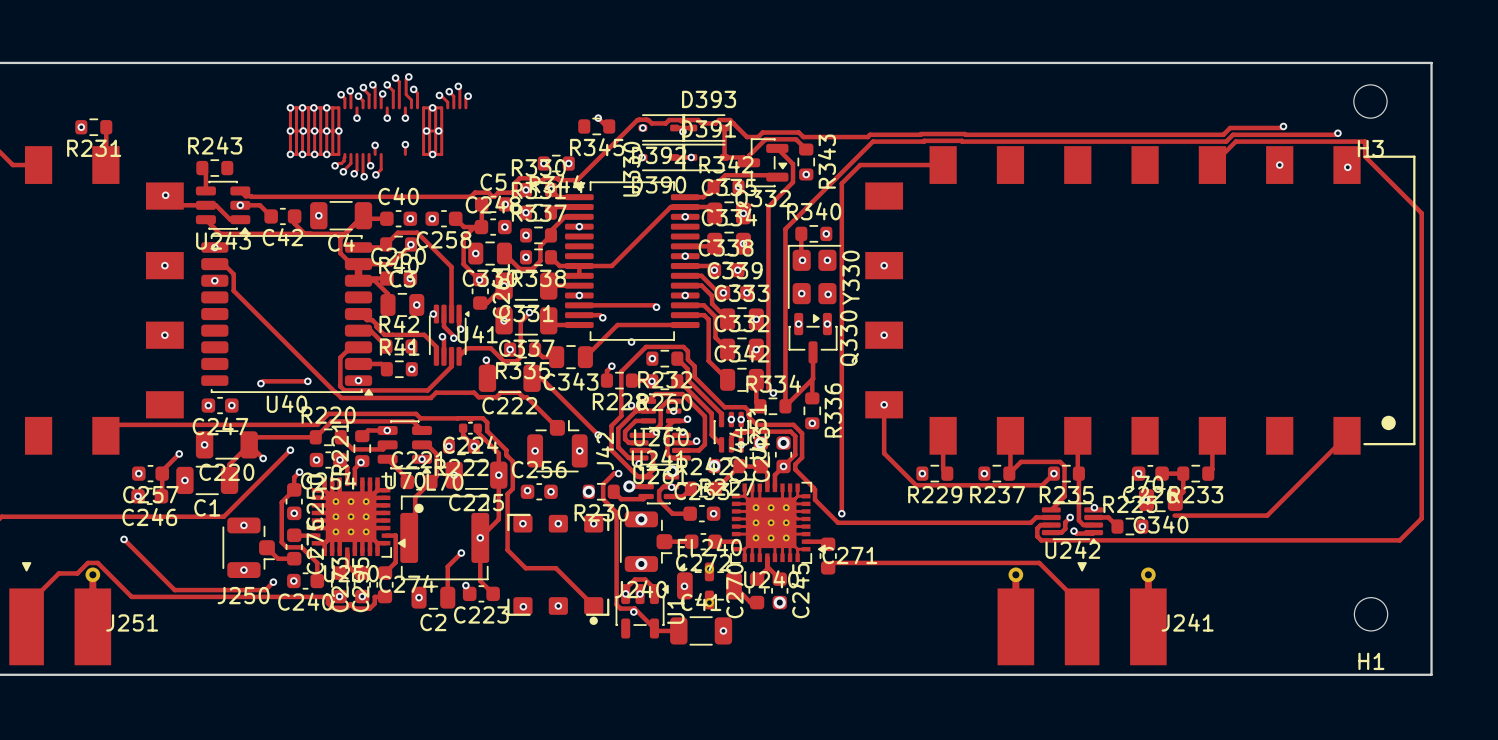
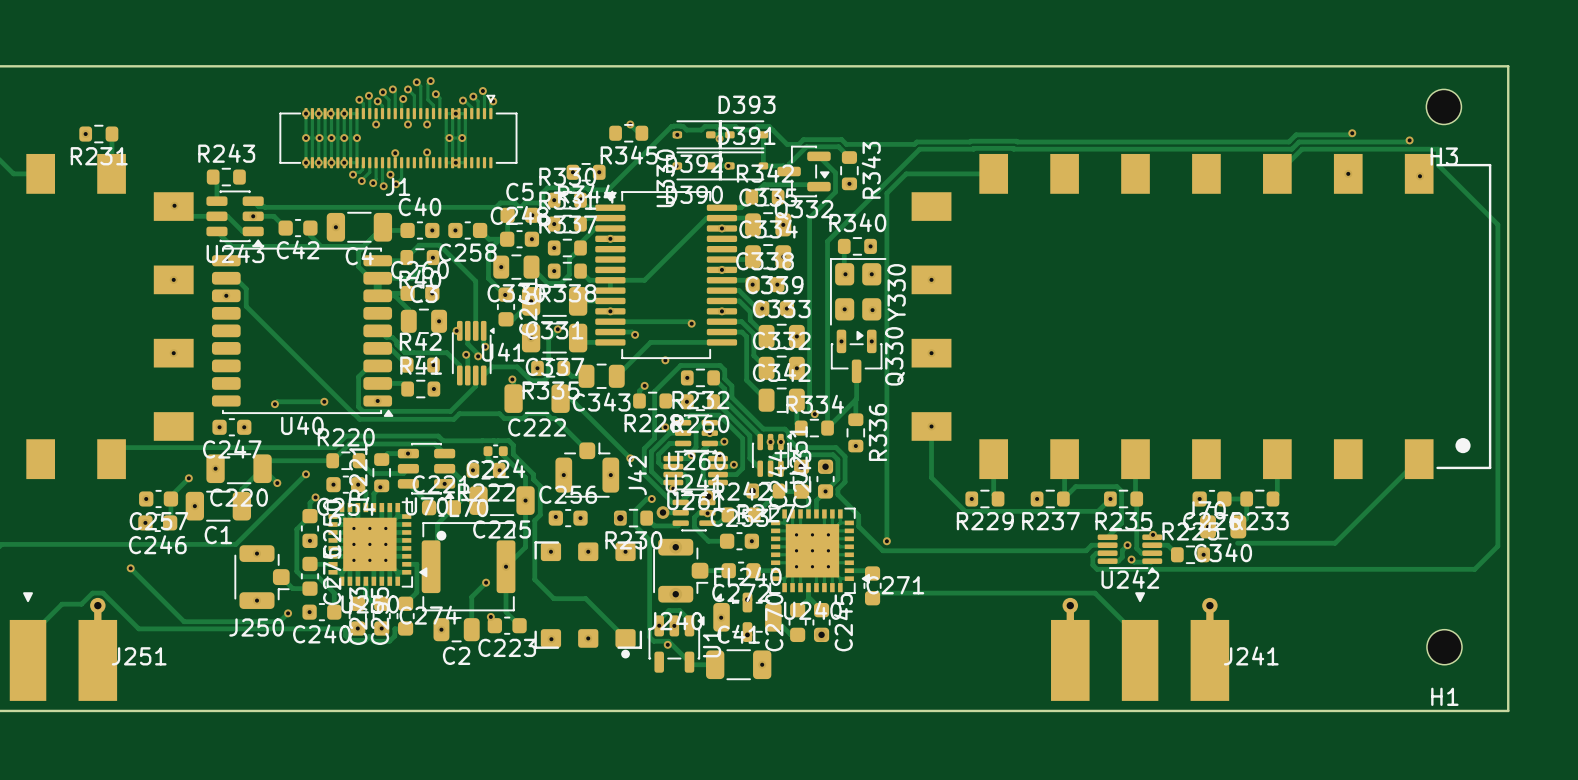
J1: none -> (398, 131)

